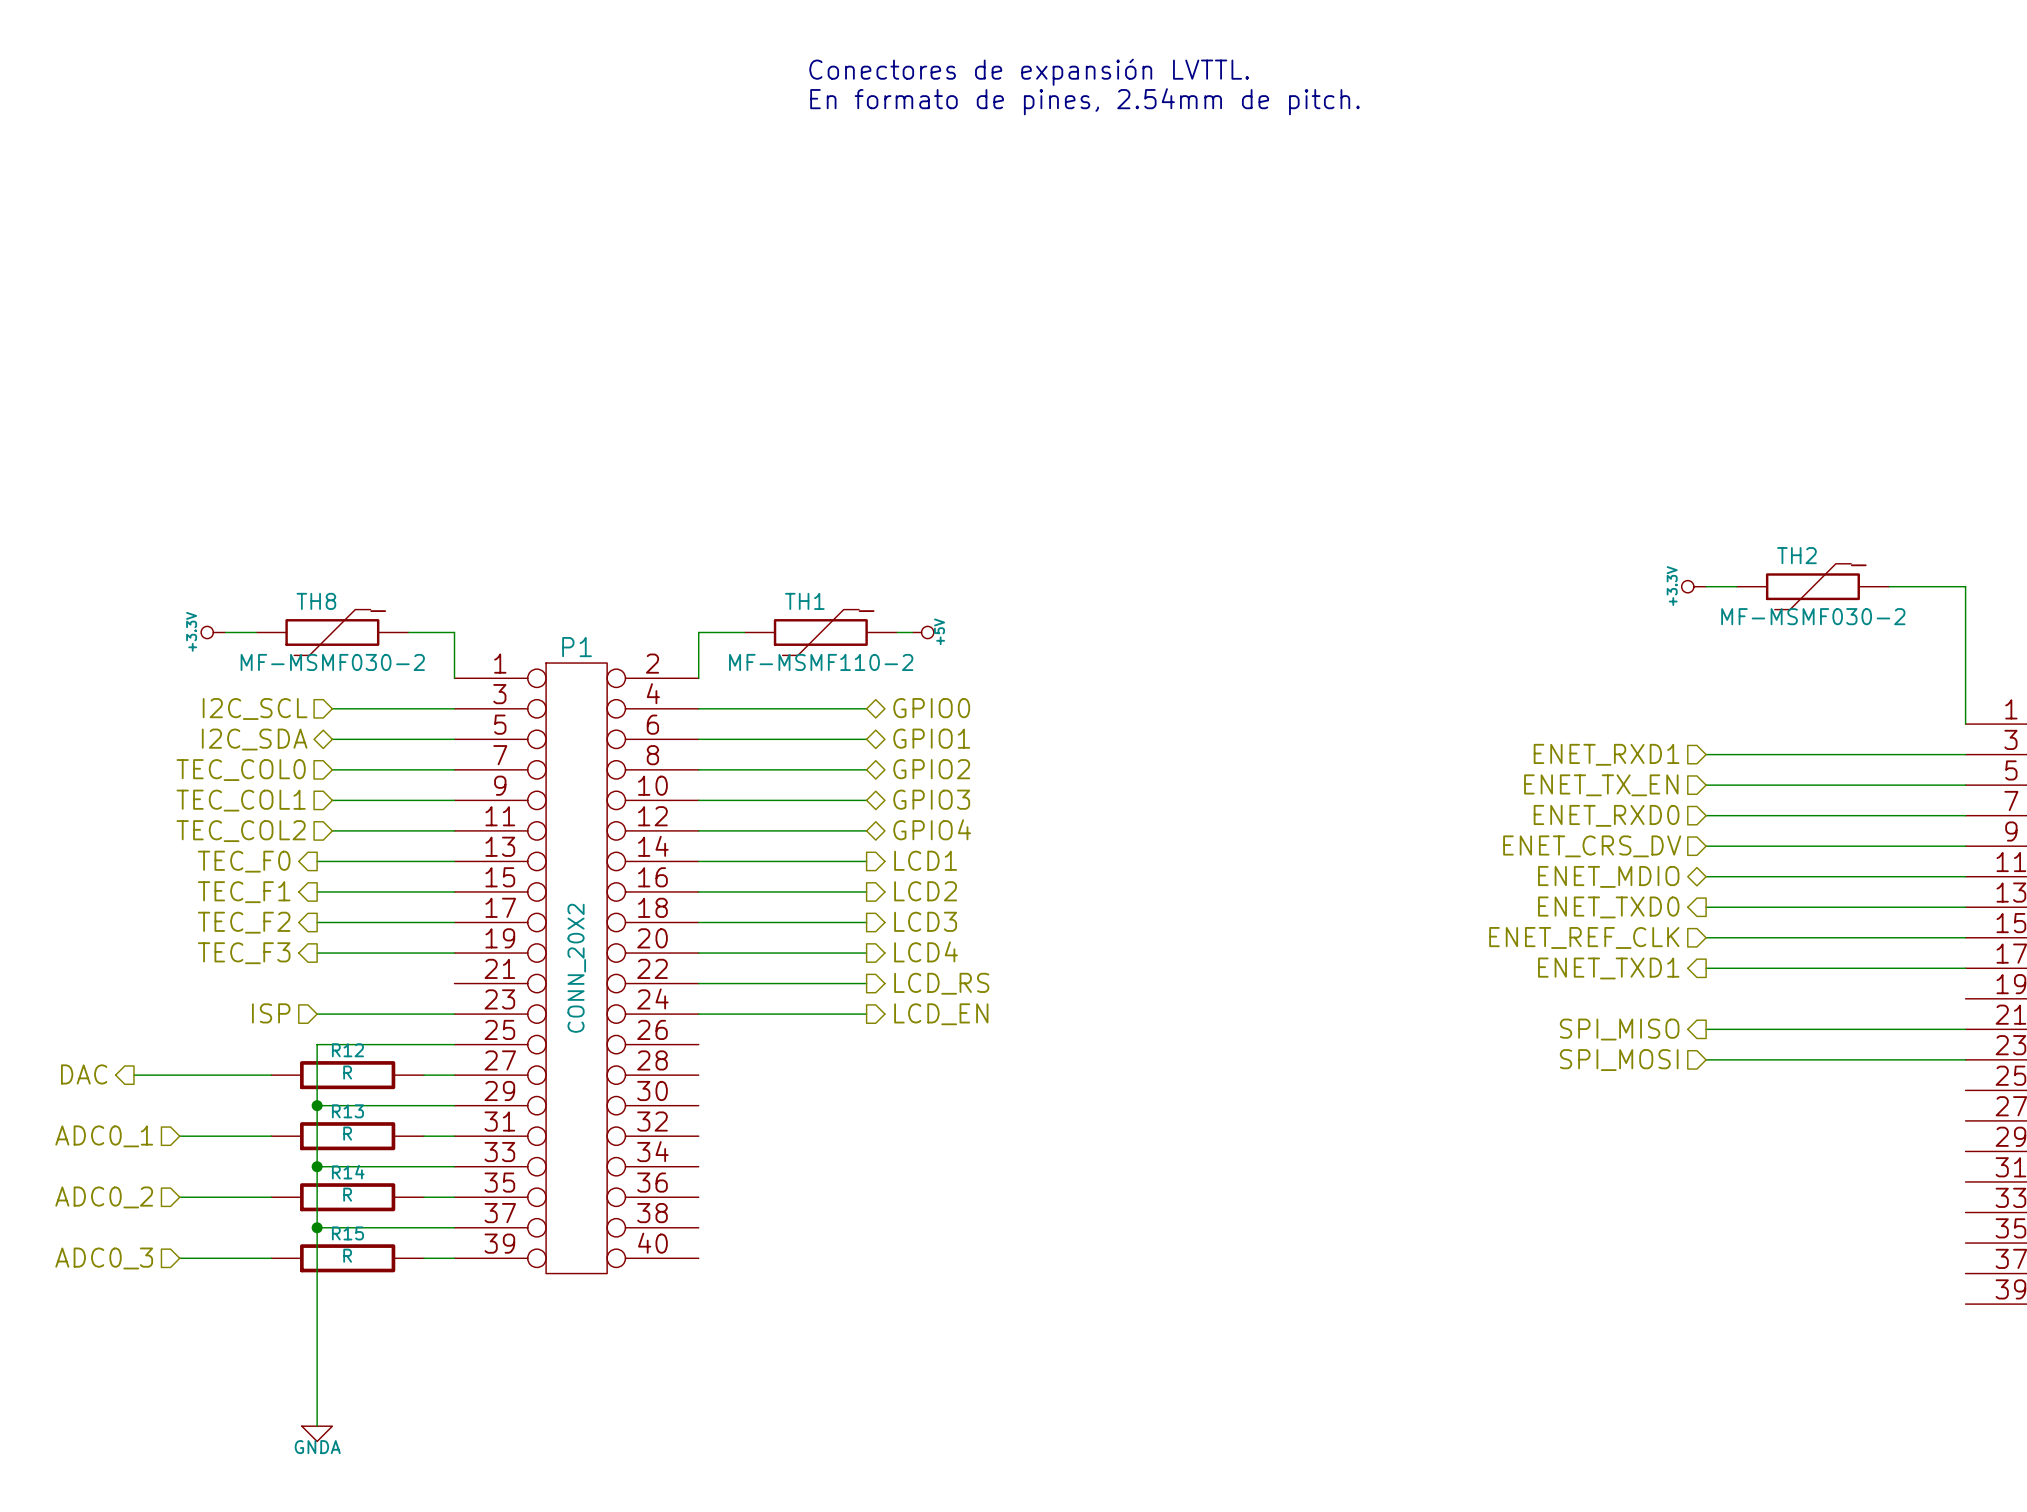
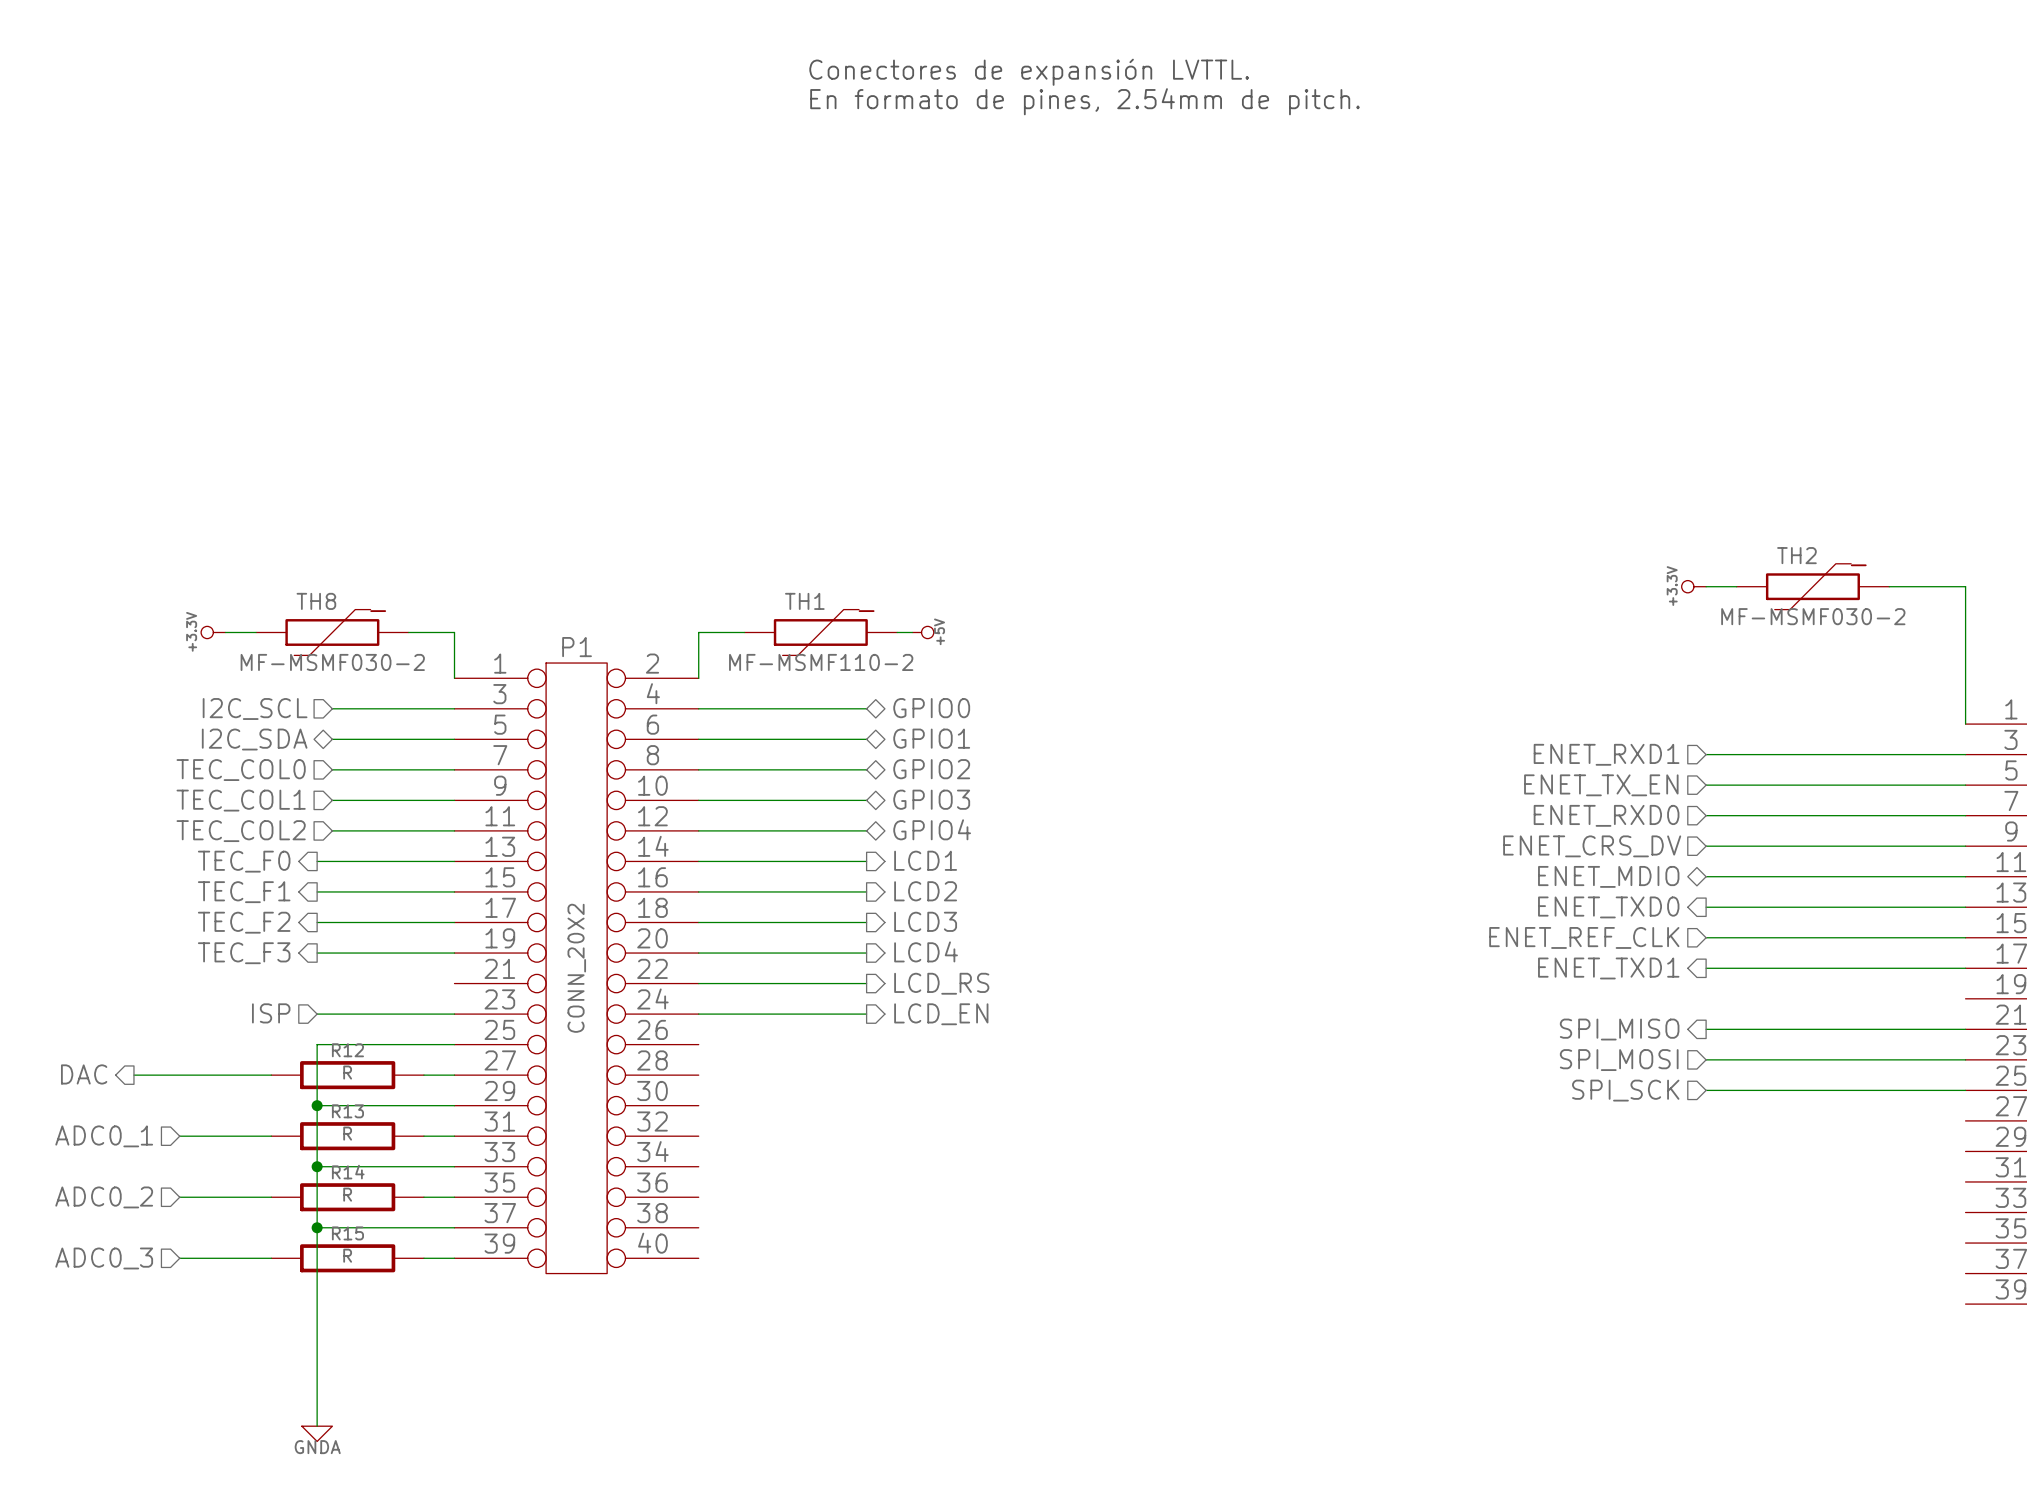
hierarchical label: none -> SPI_SCK (1625, 1090)
wire: none -> (1706, 1090) (1965, 1090)

